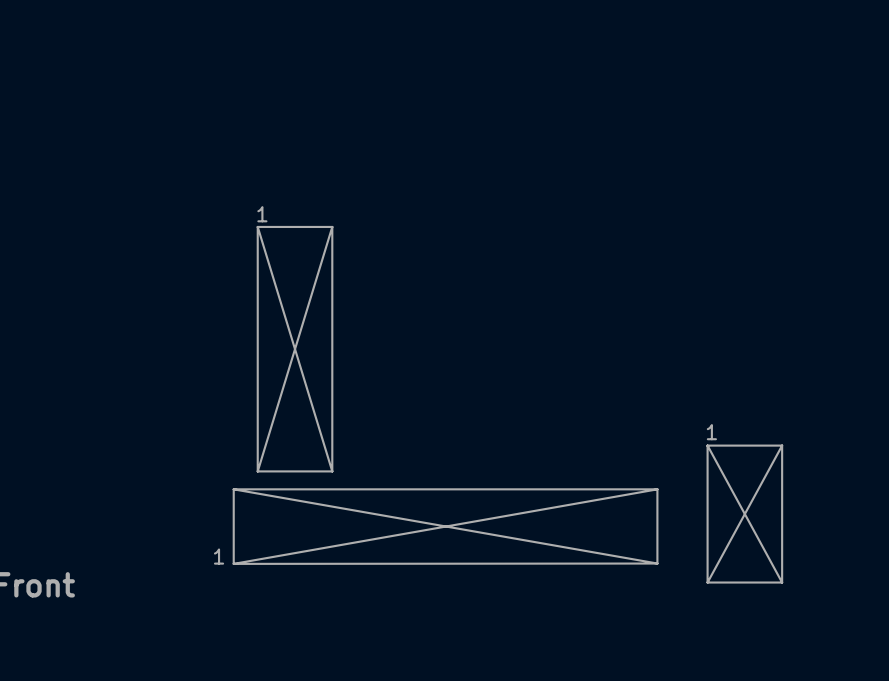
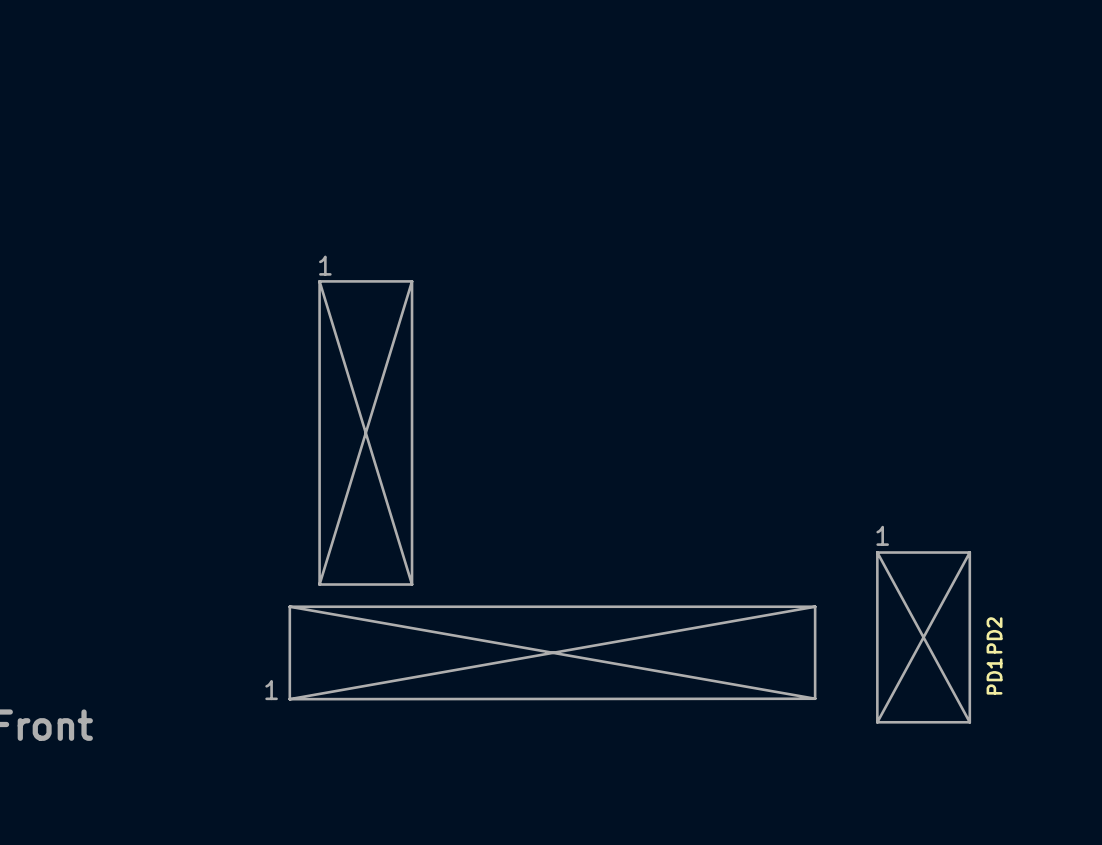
text: none -> PD2 (994, 635)
text: none -> PD1 (994, 676)

